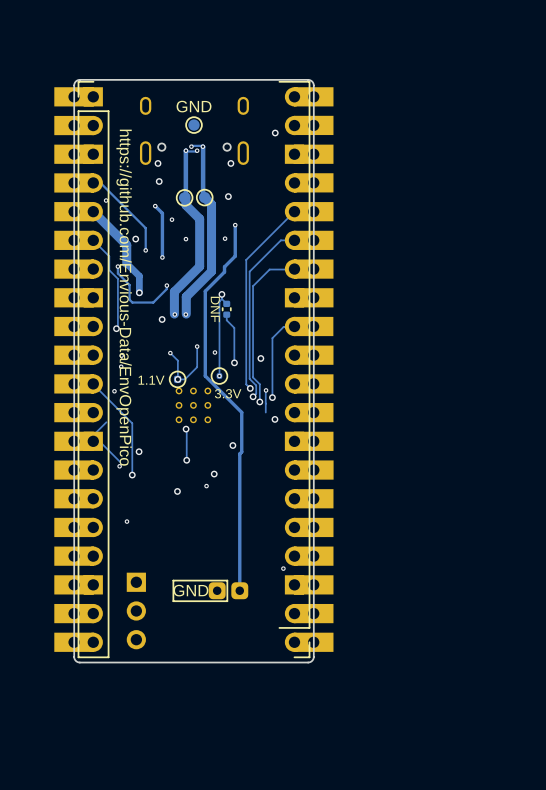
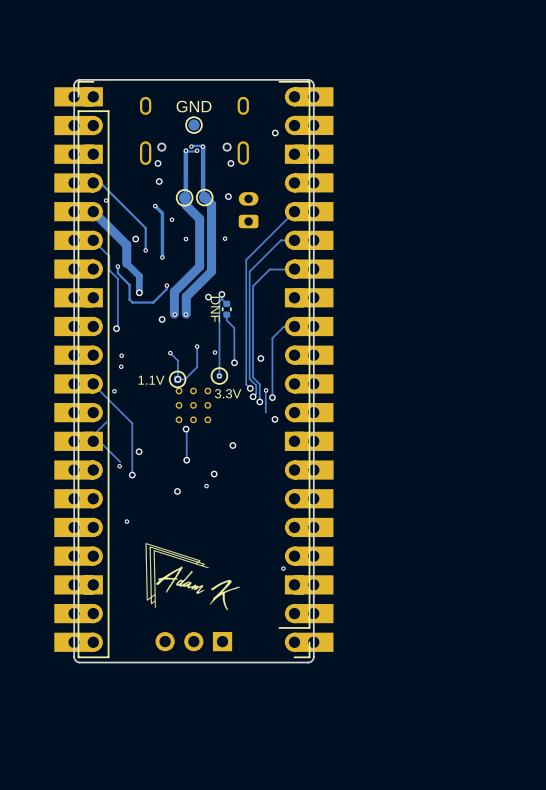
part: none -> (248, 210)
track: (235, 225) (235, 256) (224, 266) (224, 272) (205, 291) (205, 376) (241, 412) (241, 451) (239, 453) (239, 590) -> none
via: (235, 225) -> none
text: https://github.com/Envious-Data/EnvOpenPico (124, 297) -> none
via: none -> (208, 297)
drawing: none -> [145, 543, 240, 611]
line: (227, 580) (173, 580) (173, 601) (227, 601) (227, 580) -> none
text: GND (190, 590) -> none
part: (228, 590) -> none
part rotation: 0° (136, 610) -> 90° clockwise (193, 641)
part position: (136, 610) -> (193, 641)

